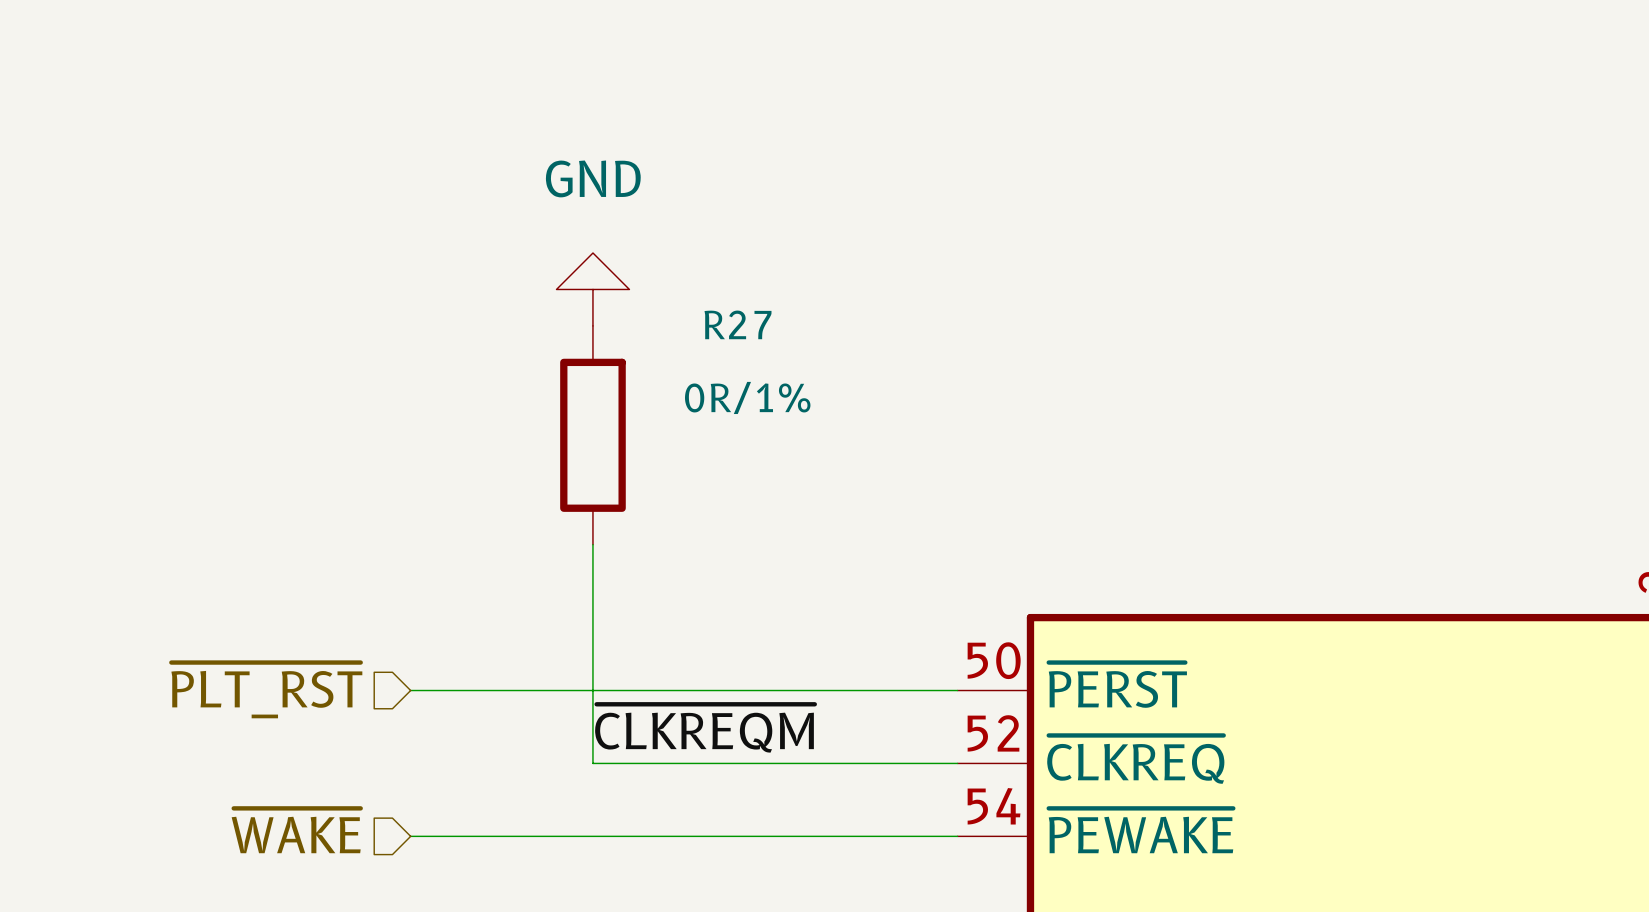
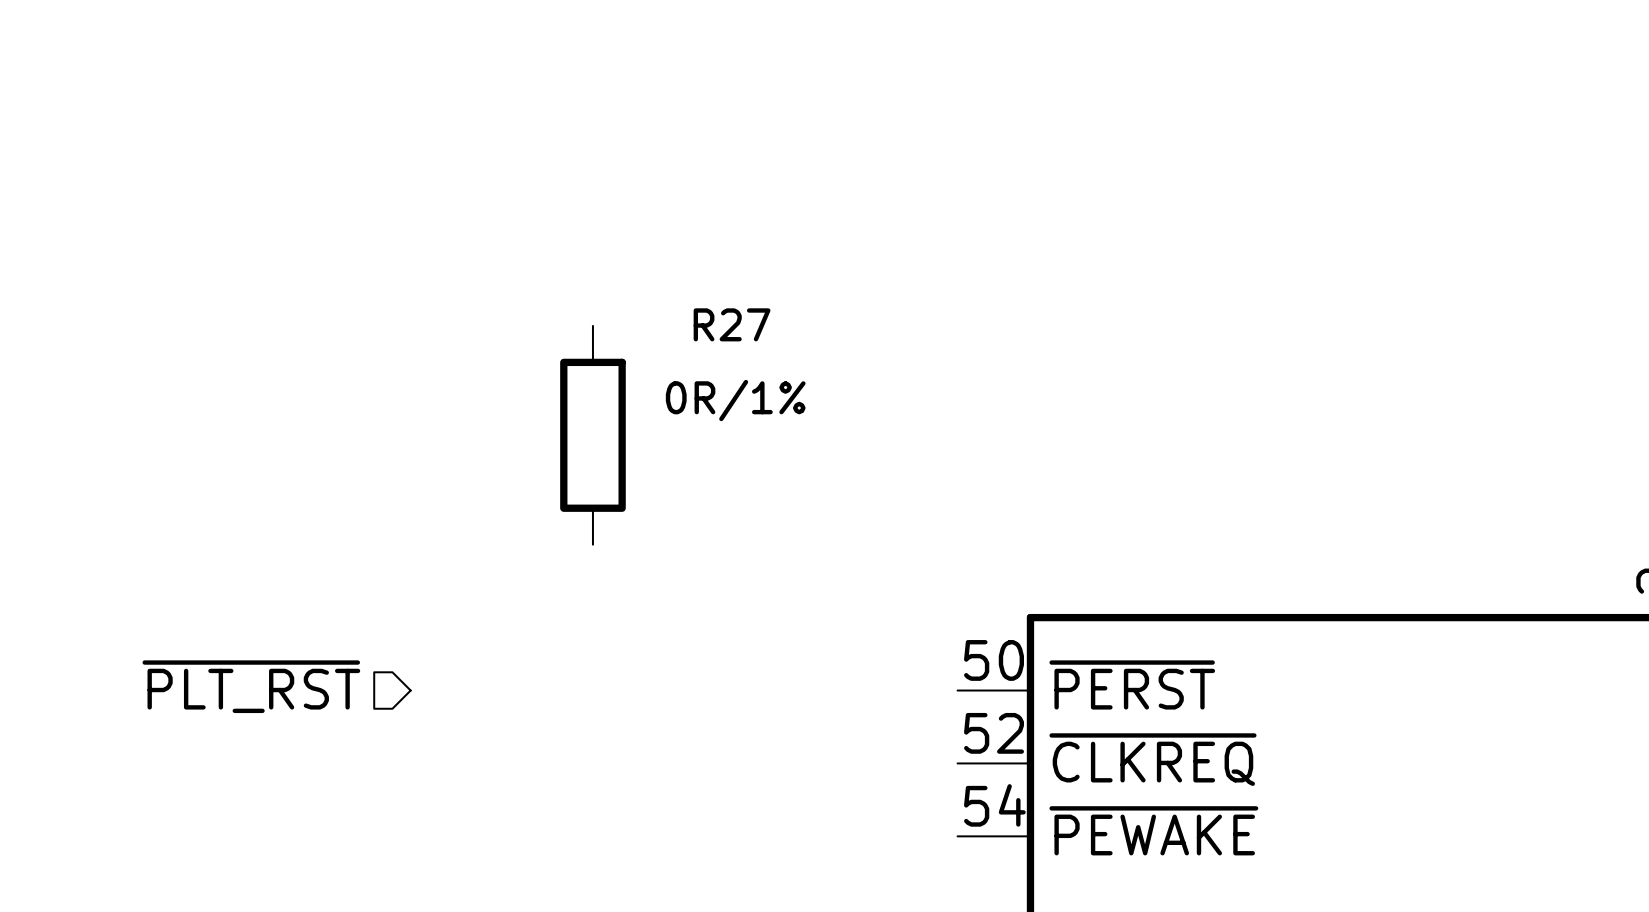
power symbol: GND (592, 289) -> none
wire: (592, 544) (592, 763) (957, 763) -> none
wire: (410, 690) (957, 690) -> none
label: ~{CLKREQM} (704, 728) -> none
hierarchical label: ~{WAKE} (296, 830) -> none
wire: (410, 836) (957, 836) -> none

